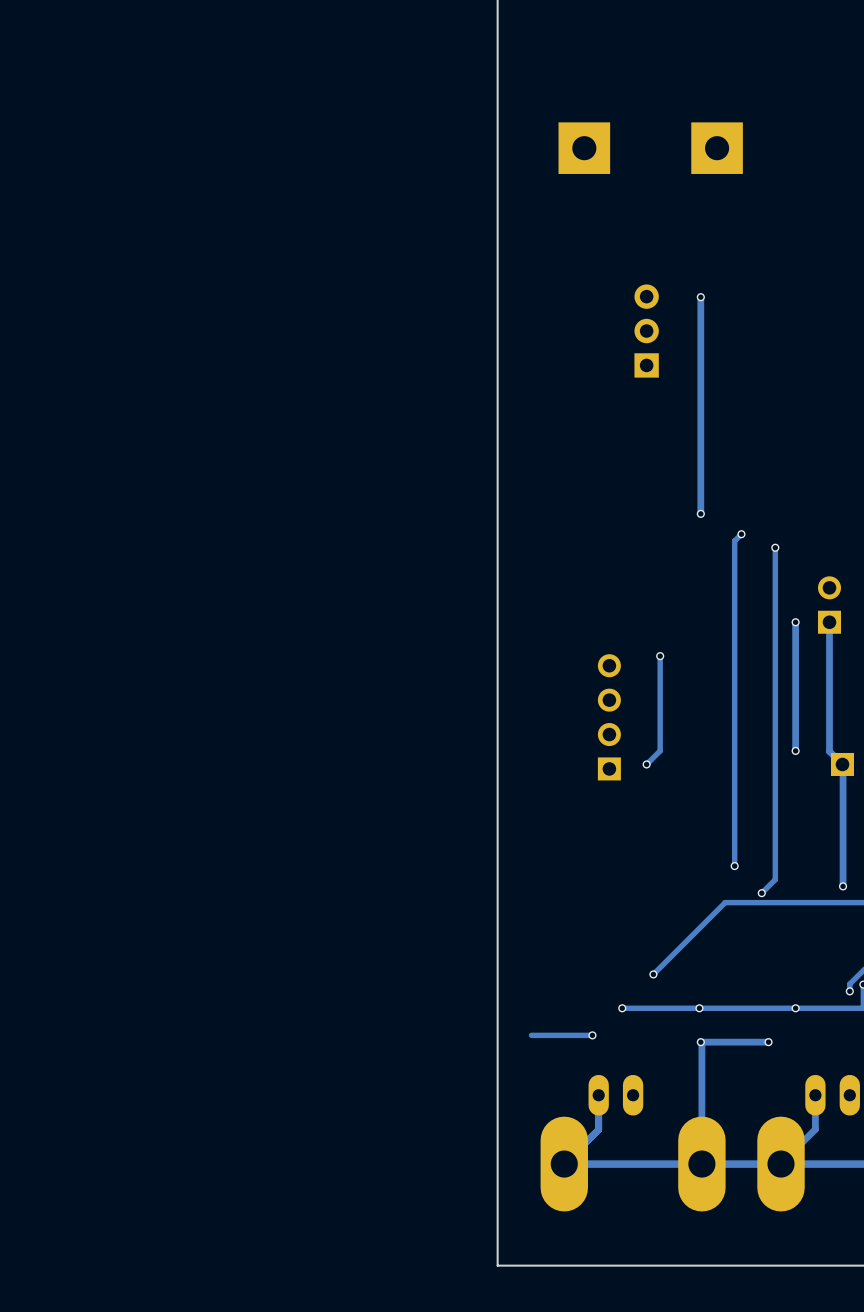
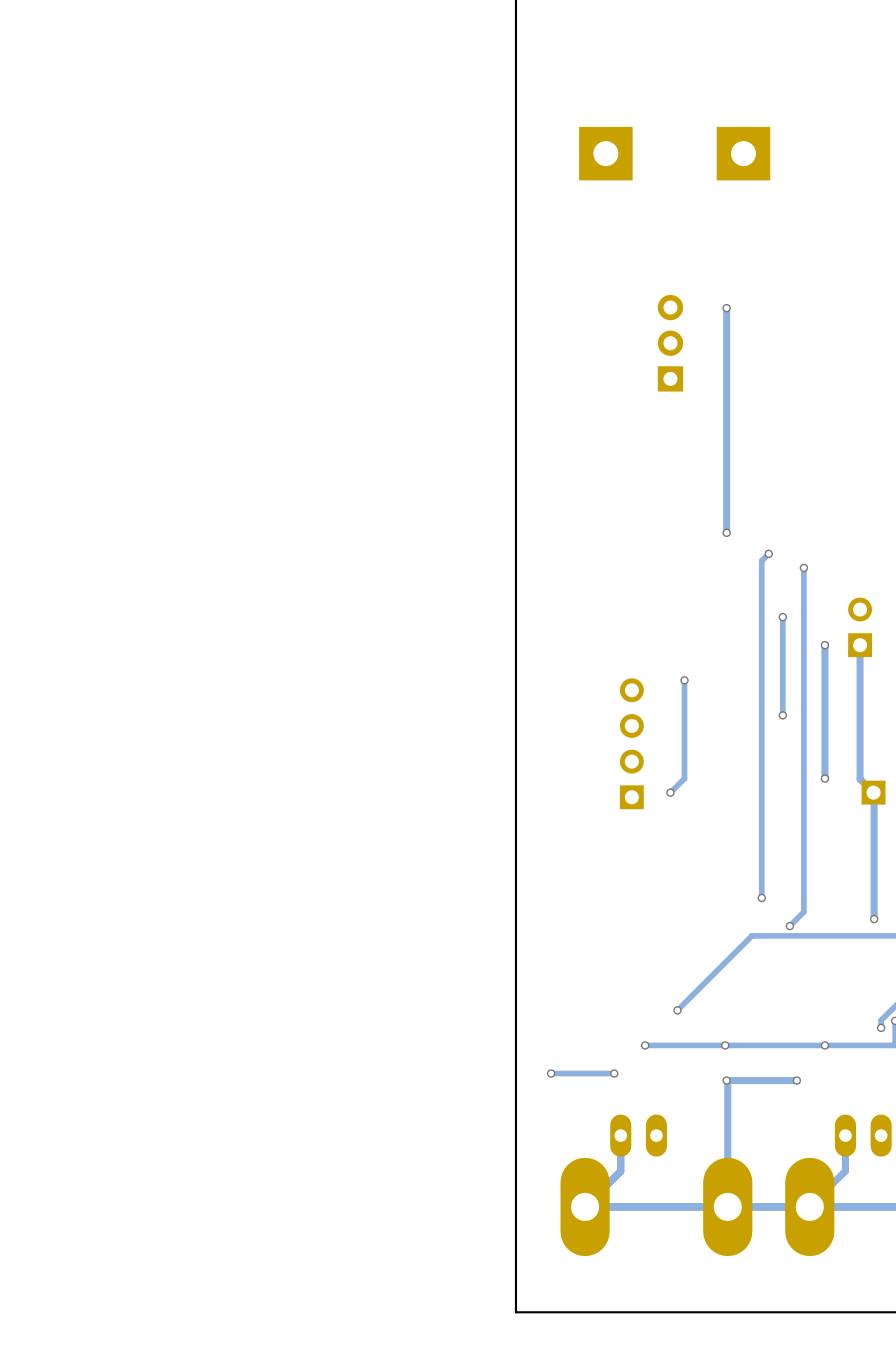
track: none -> (782, 617) (782, 715)
via: none -> (782, 617)
via: none -> (782, 715)
via: none -> (551, 1073)

